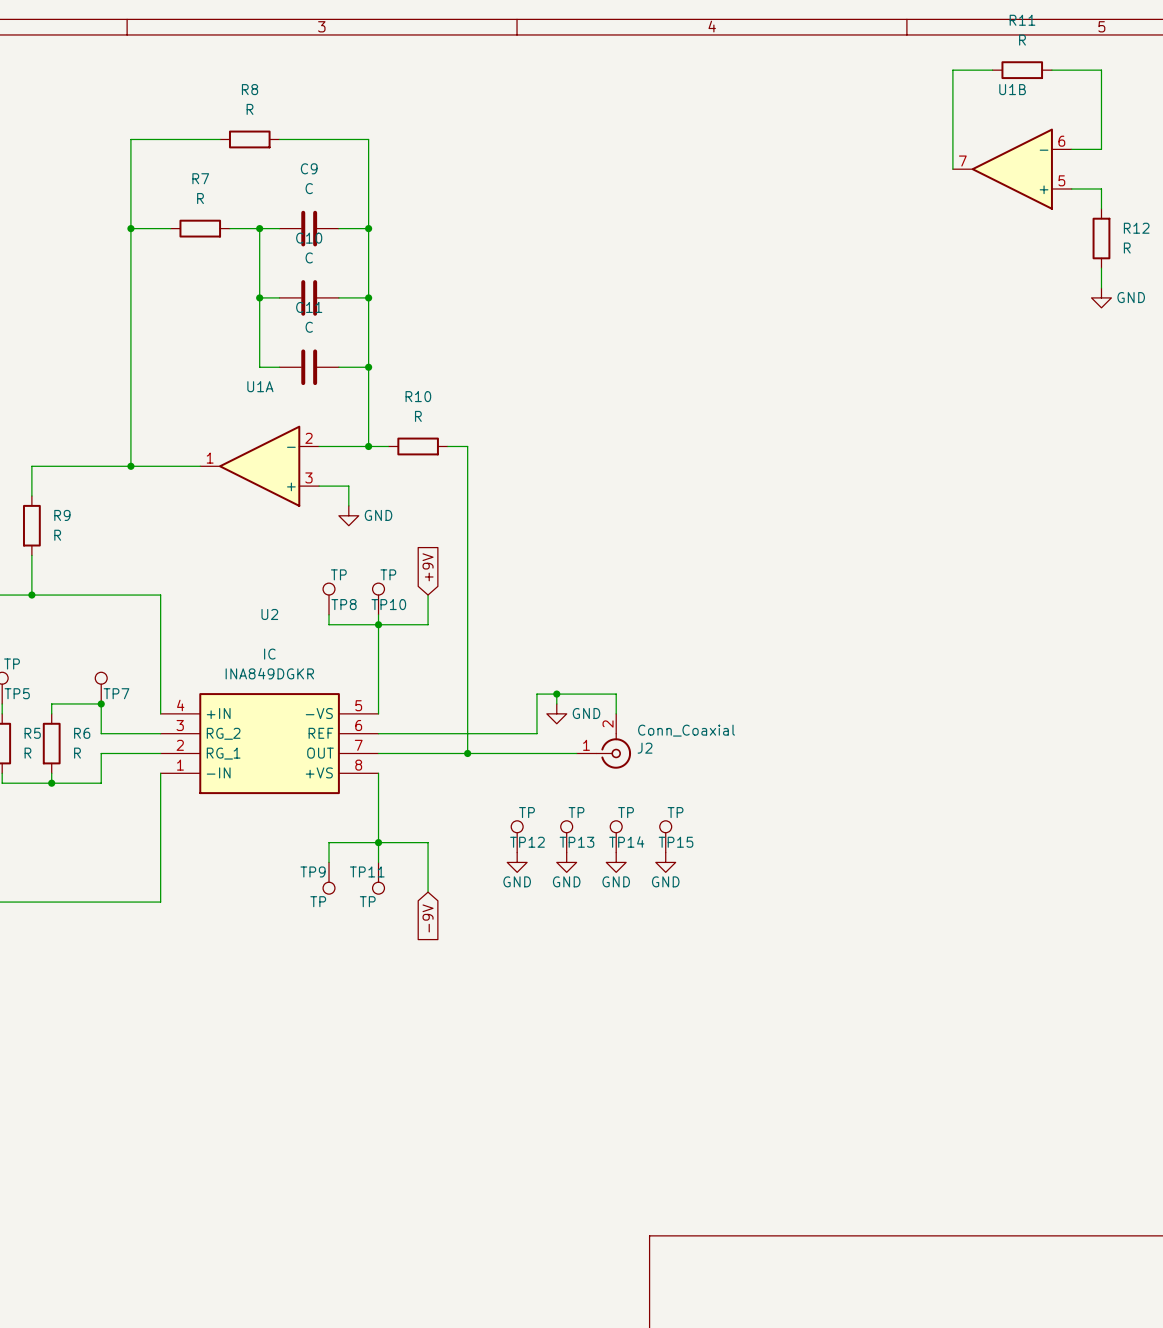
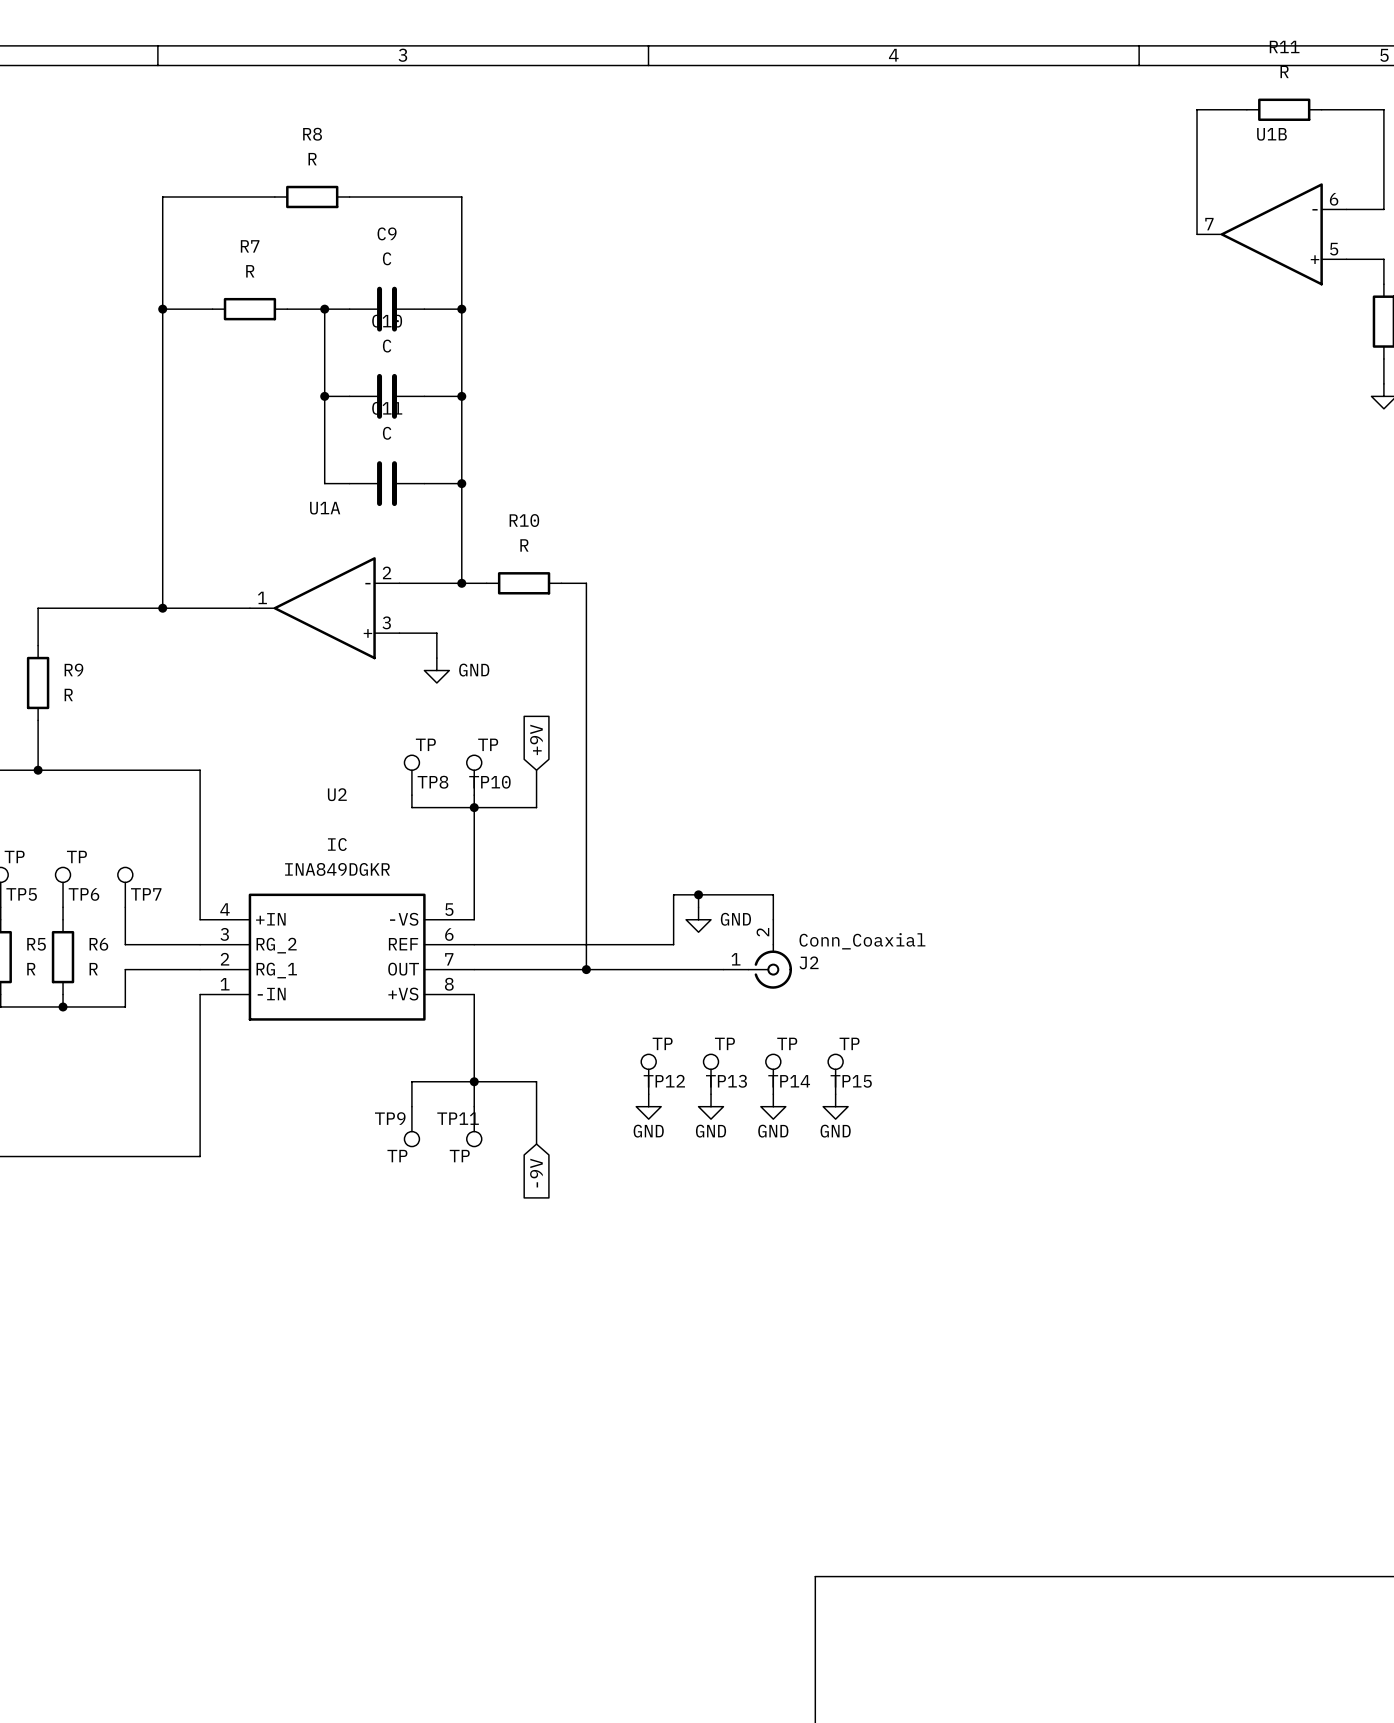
TP6: none -> TP (63, 887)
wire: (51, 703) (101, 703) -> none
junction: (101, 703) -> none

